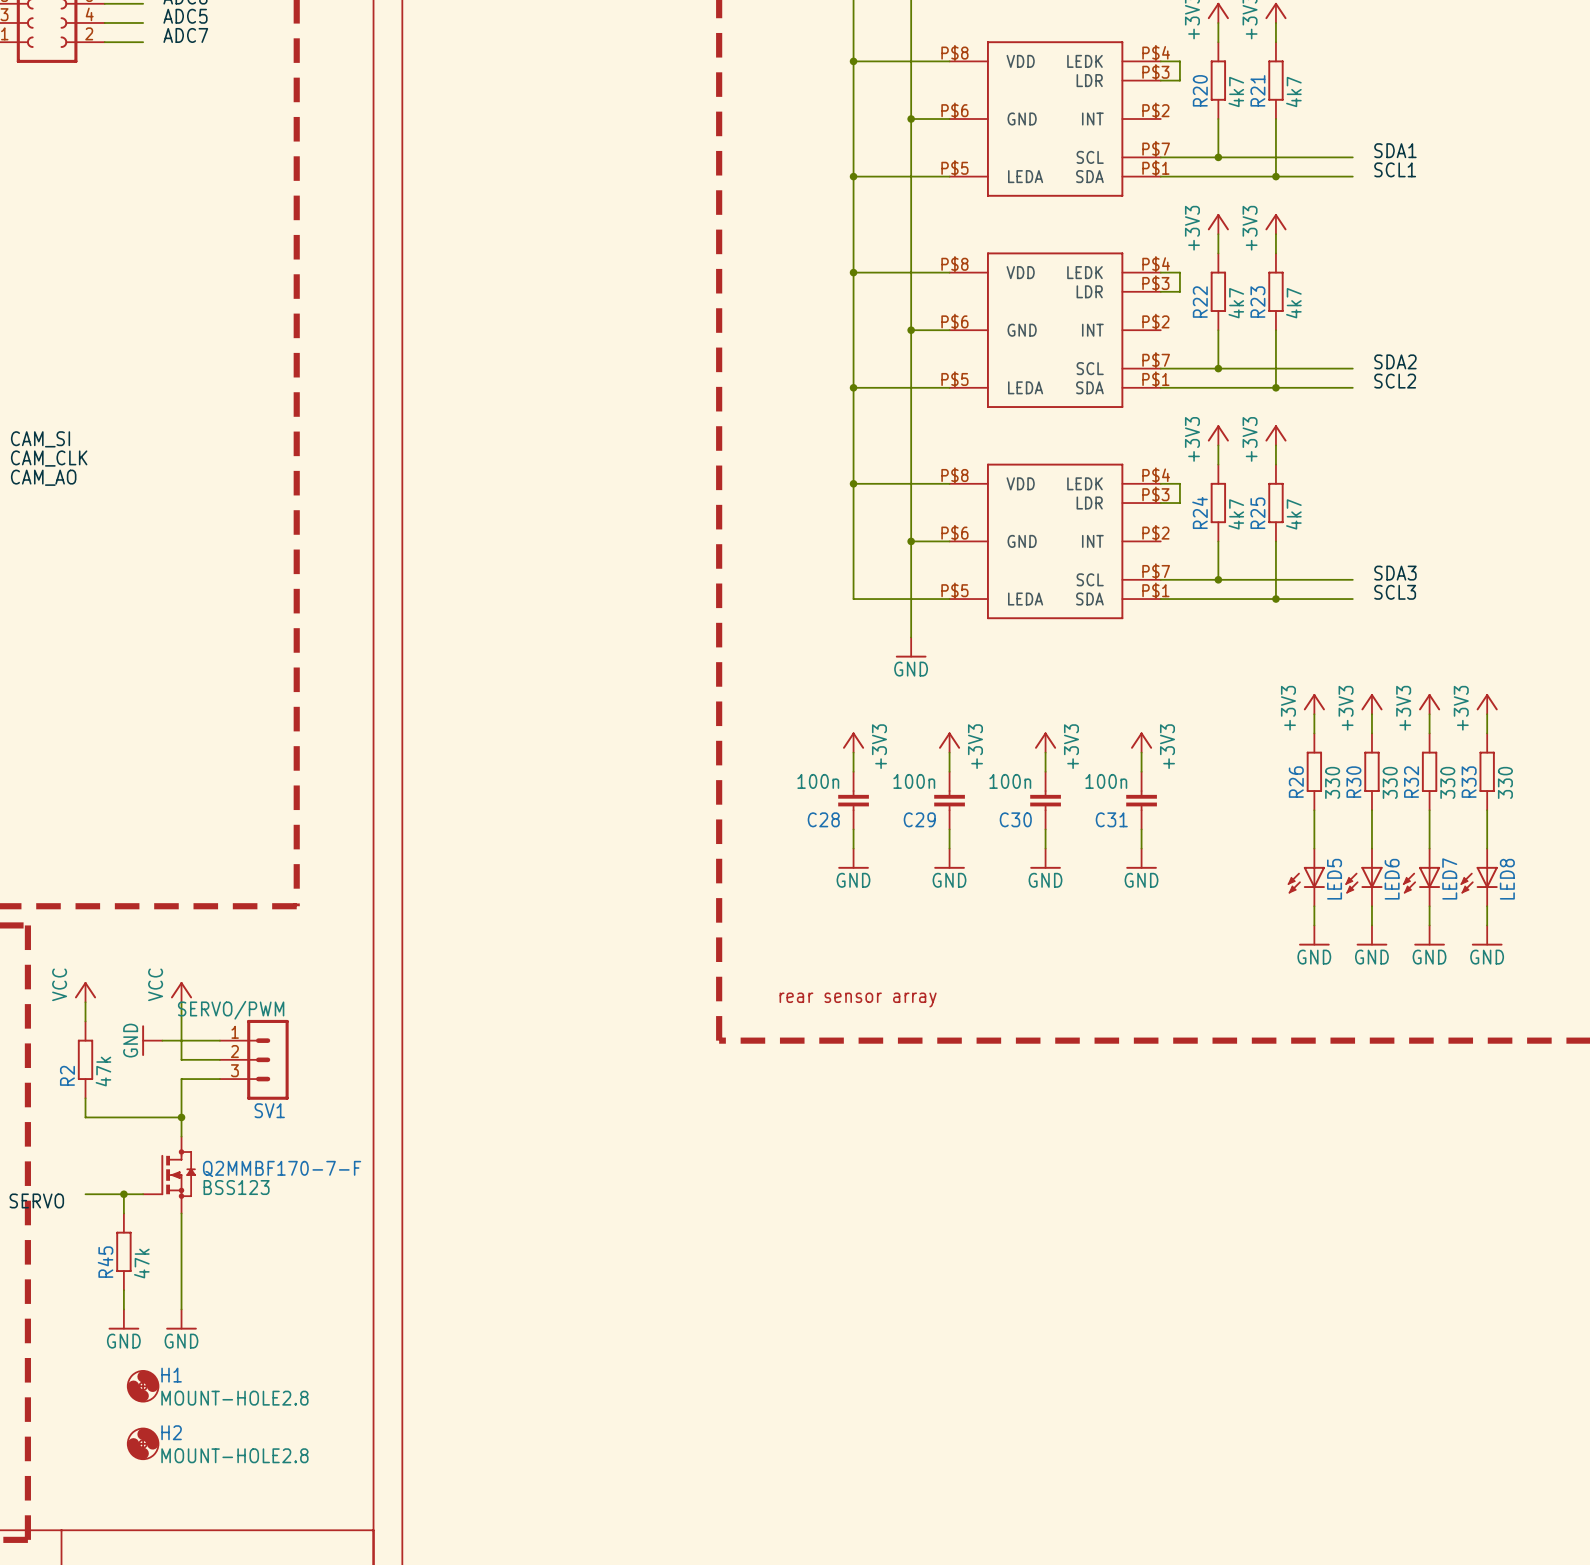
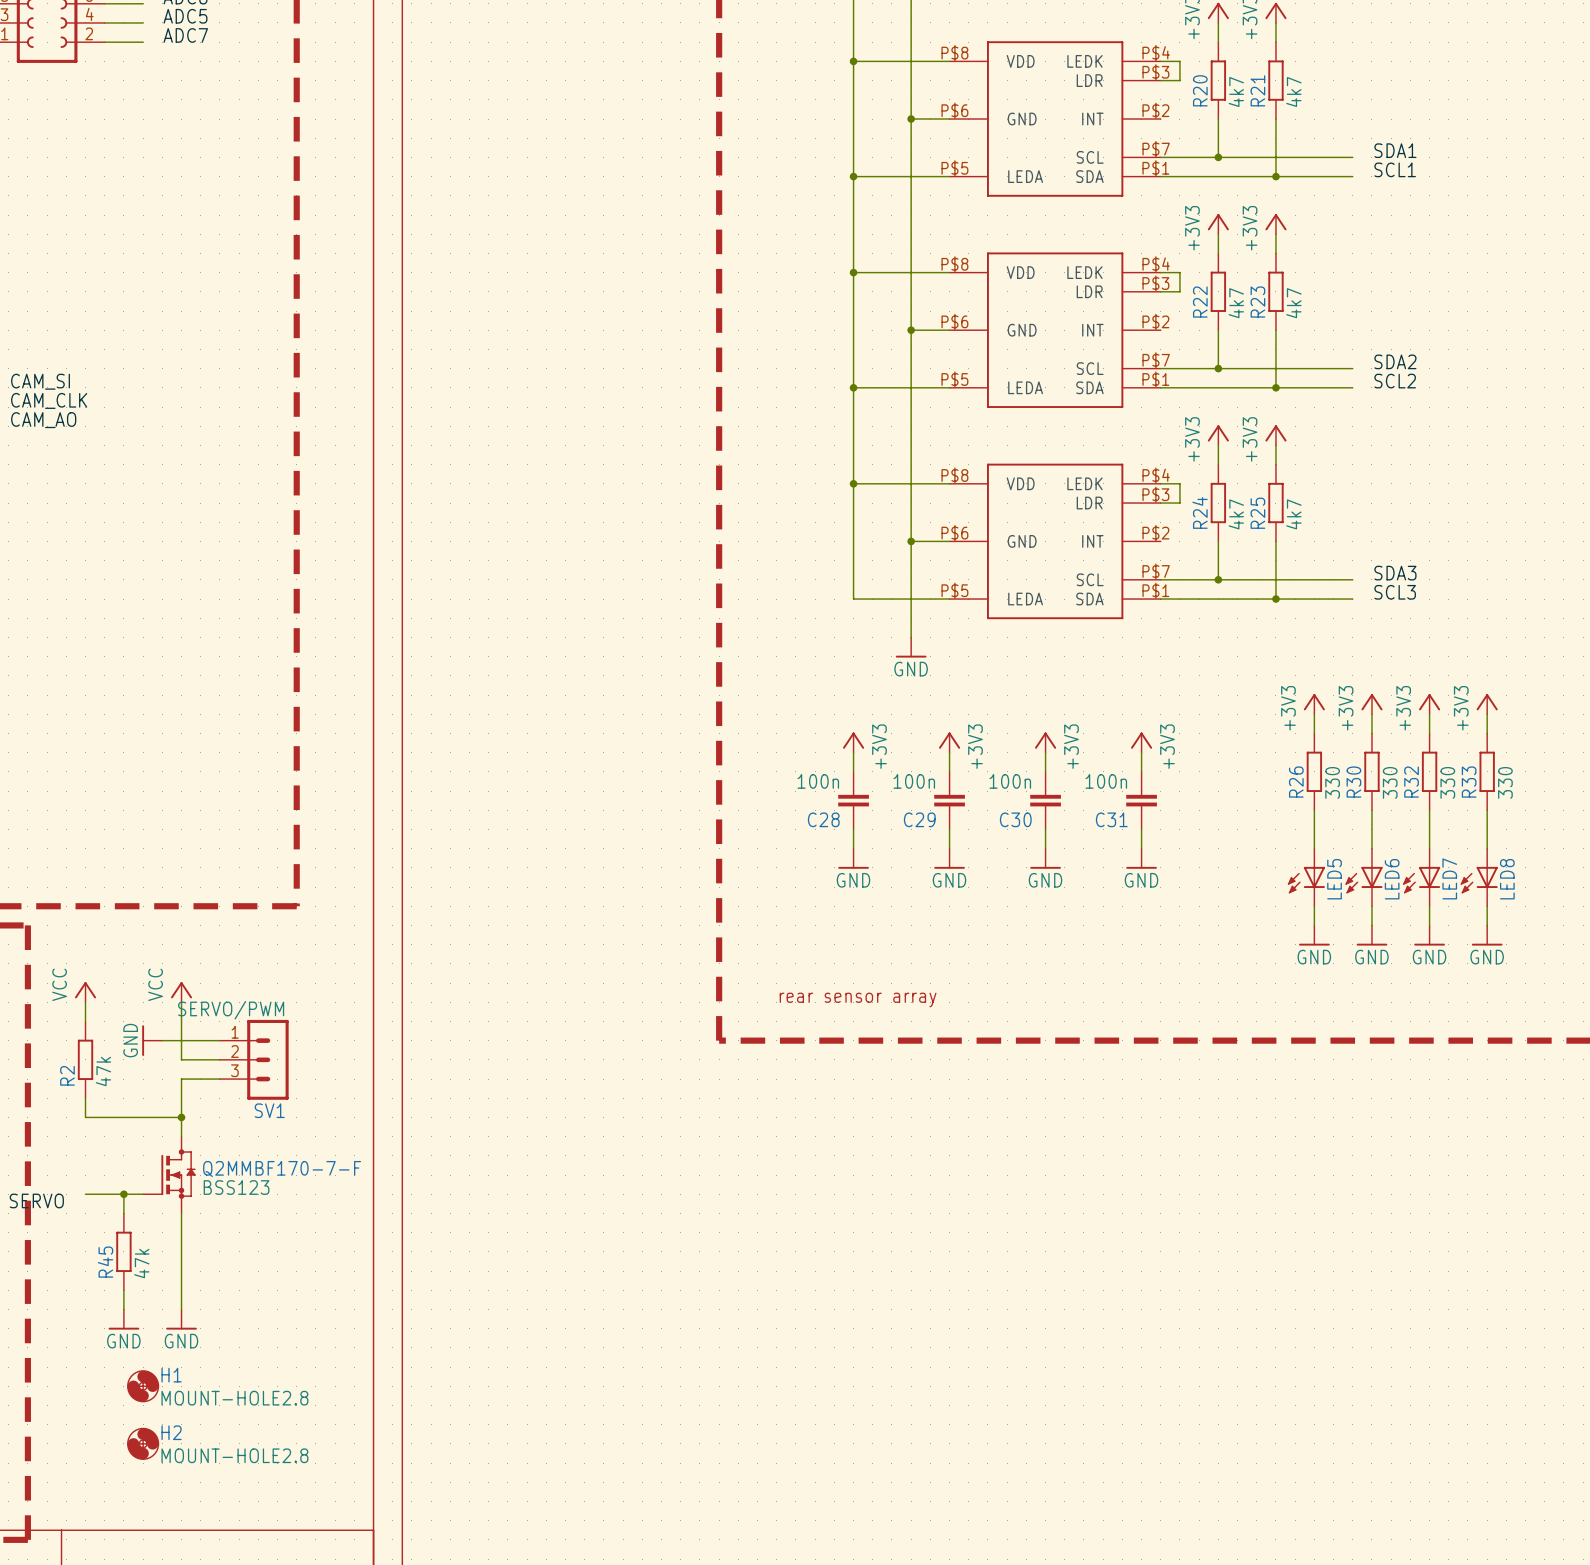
label position: CAM_SI (40, 439) -> CAM_SI (40, 381)
label position: CAM_CLK (49, 458) -> CAM_CLK (49, 400)
label position: CAM_AO (43, 477) -> CAM_AO (43, 420)

